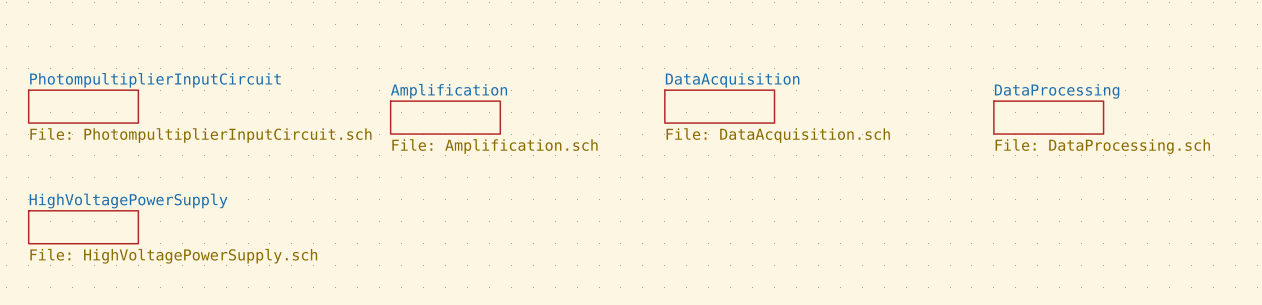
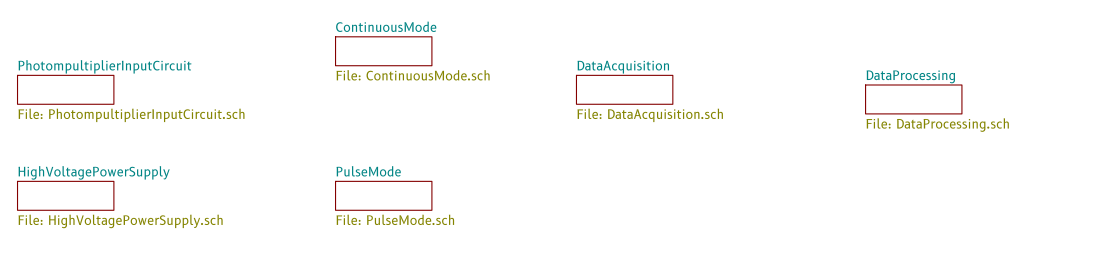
sheet ContinuousMode: none -> File: ContinuousMode.sch (383, 51)
sheet Amplification: File: Amplification.sch (445, 117) -> none
sheet PulseMode: none -> File: PulseMode.sch (383, 195)

